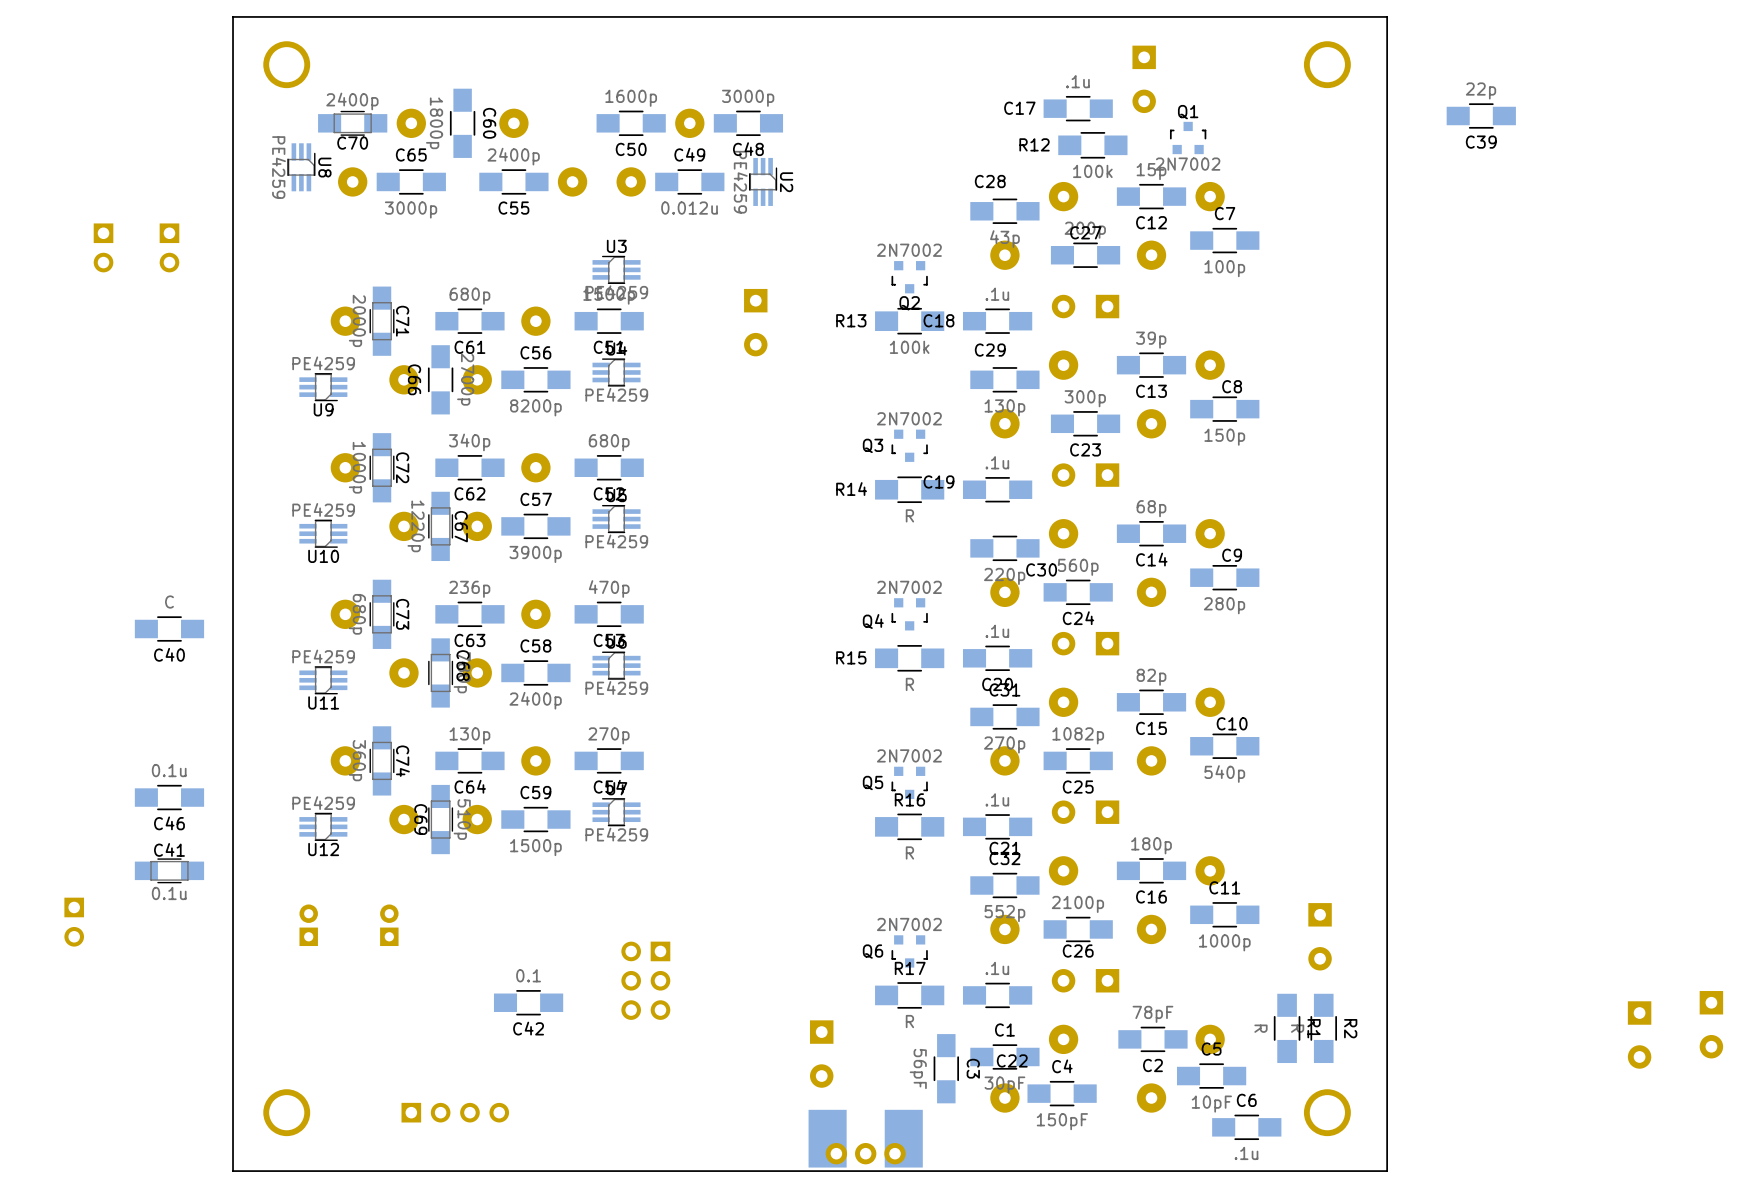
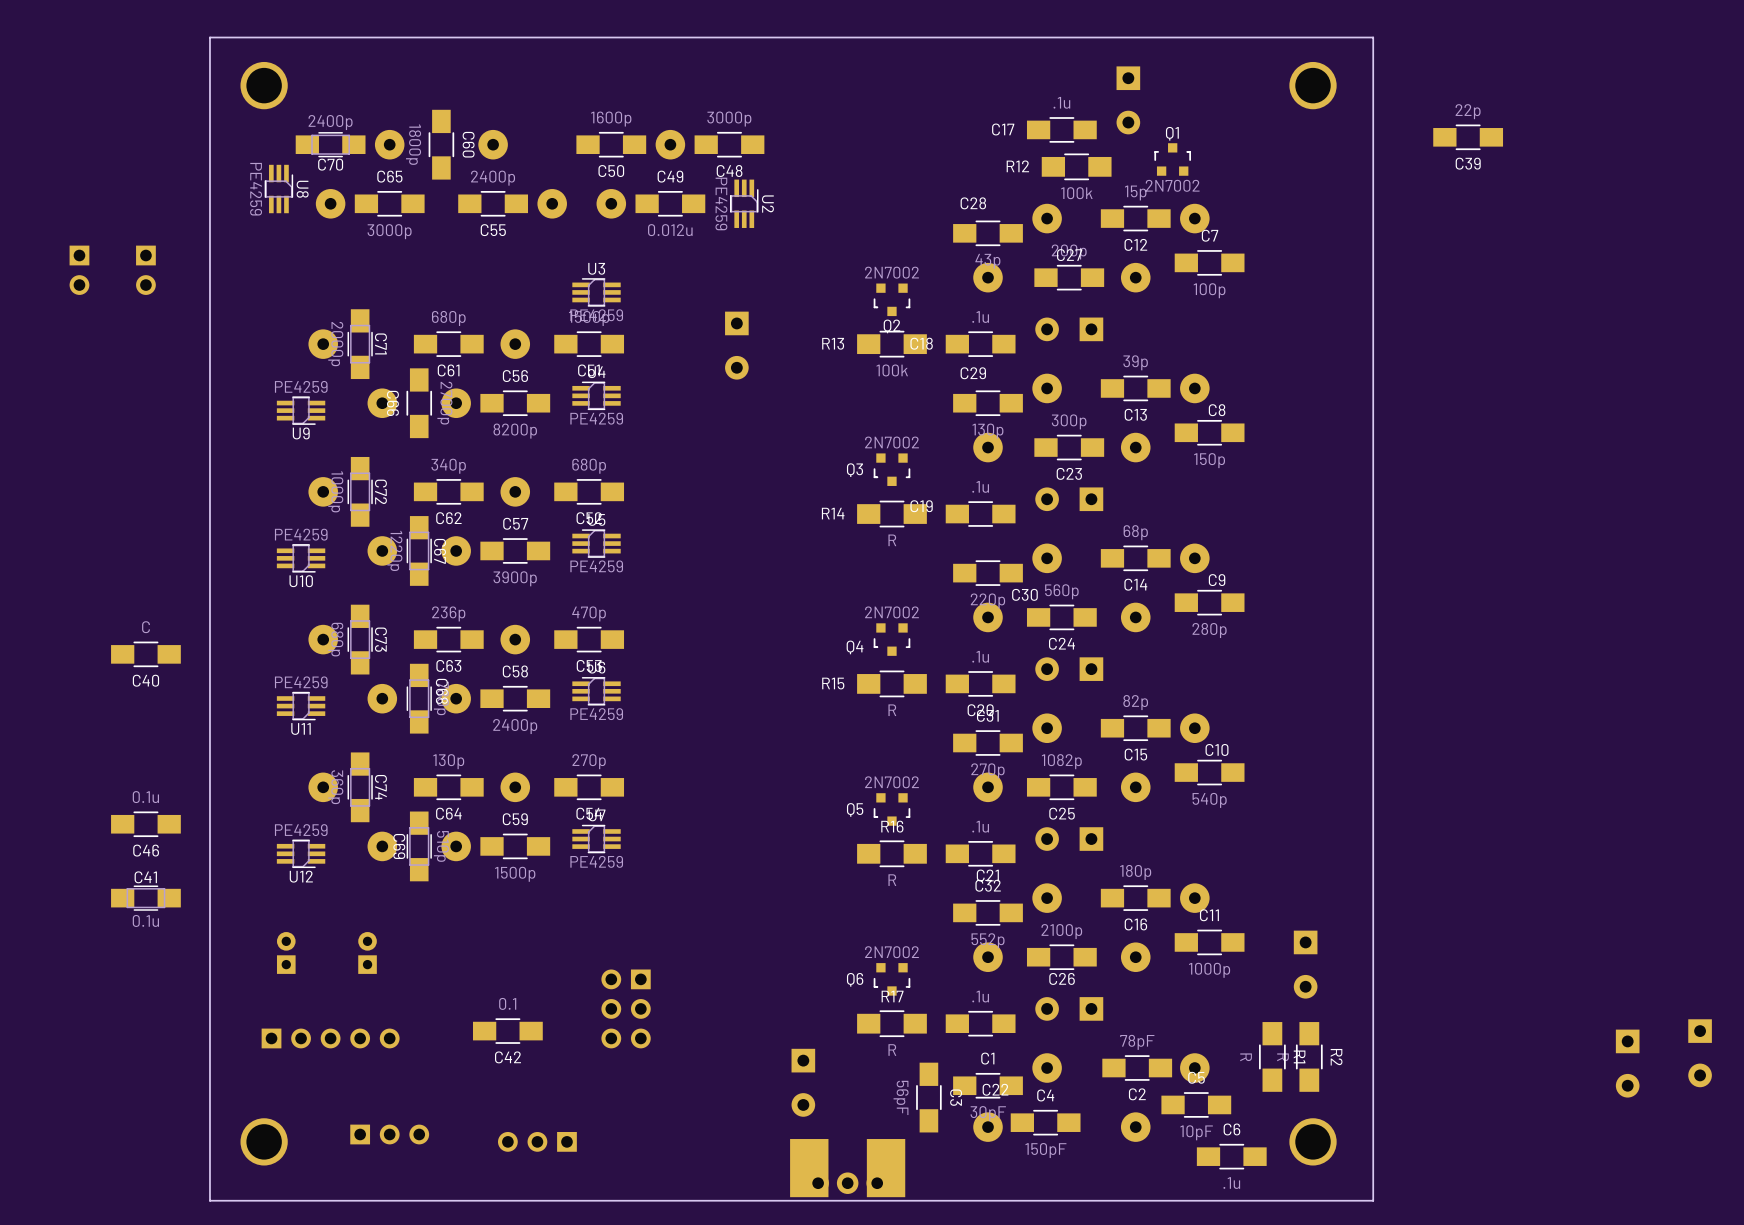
part: (74, 922) -> none
part: none -> (330, 1038)
part: none -> (389, 1134)
part: (455, 1112) -> none
part: none -> (537, 1141)

